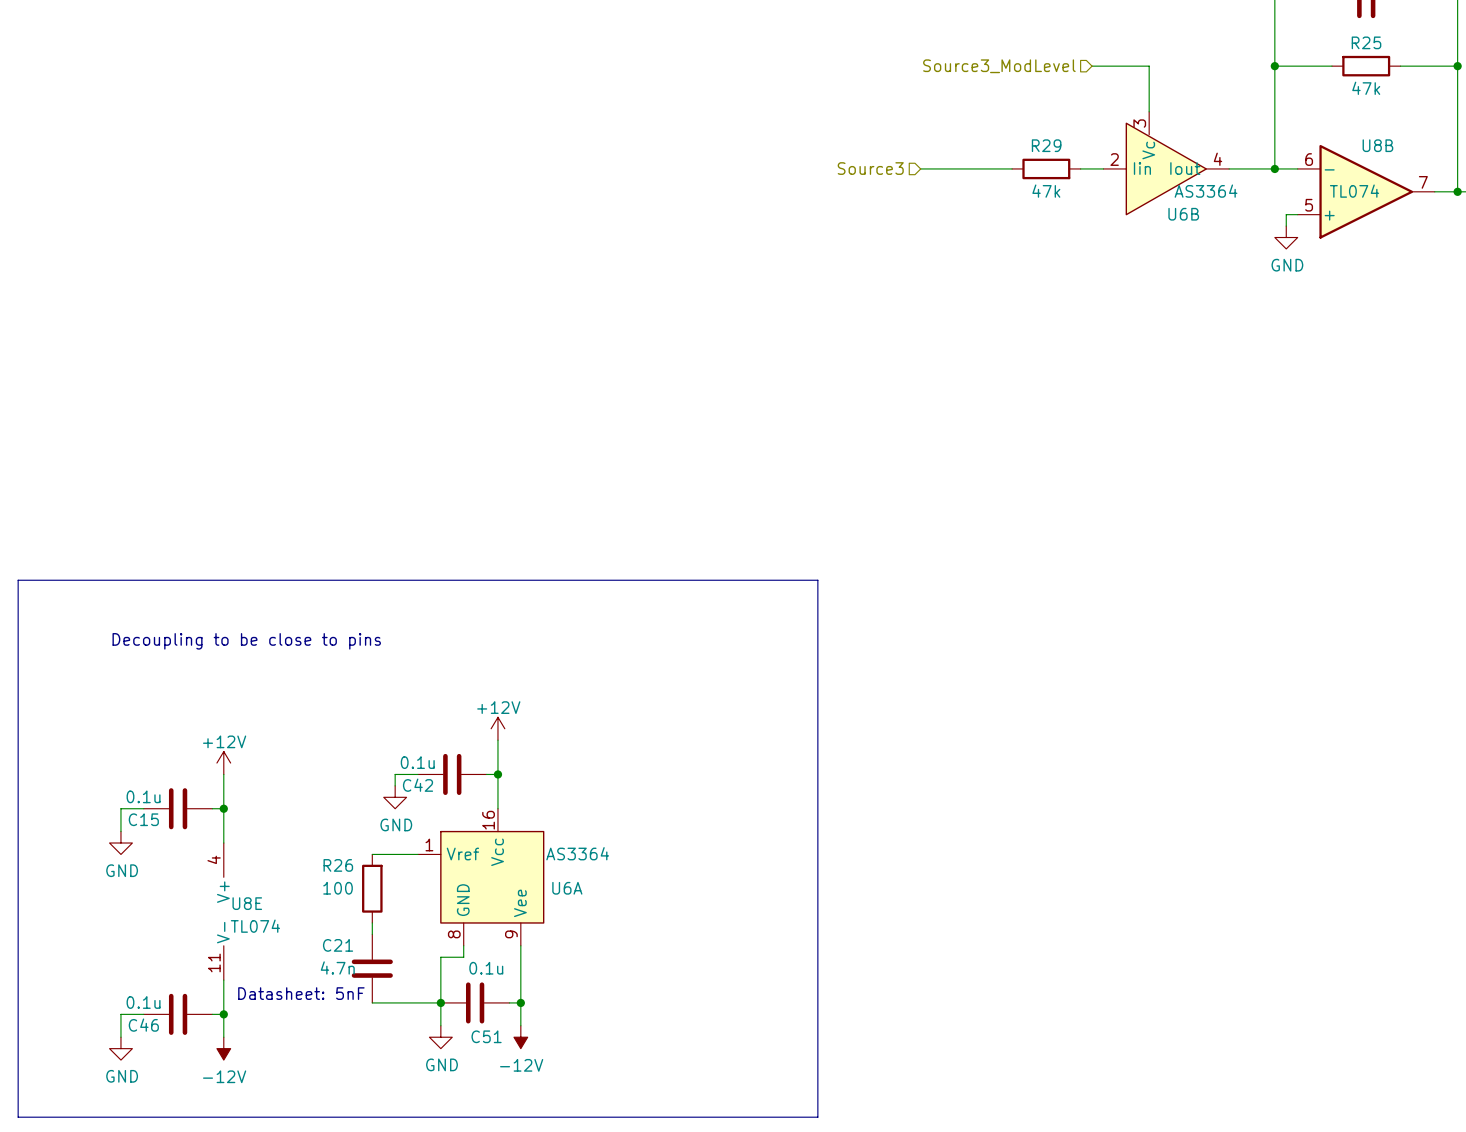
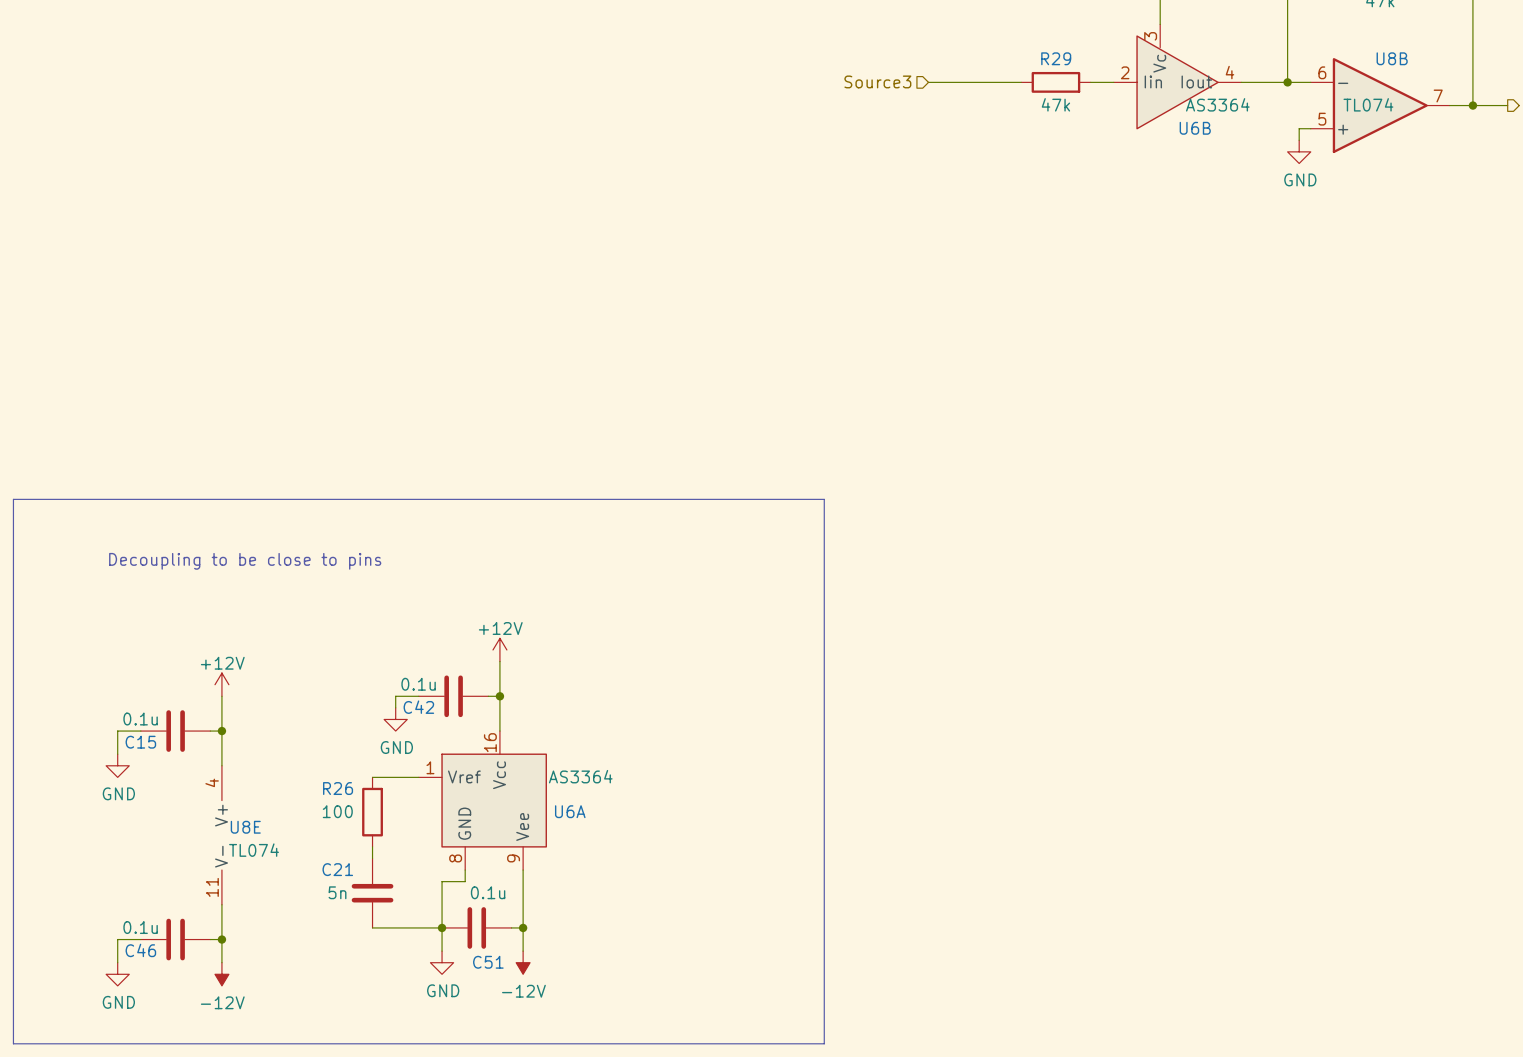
C21 value: 4.7n (337, 967) -> 5n (337, 892)
text: Datasheet: 5nF (301, 993) -> none

